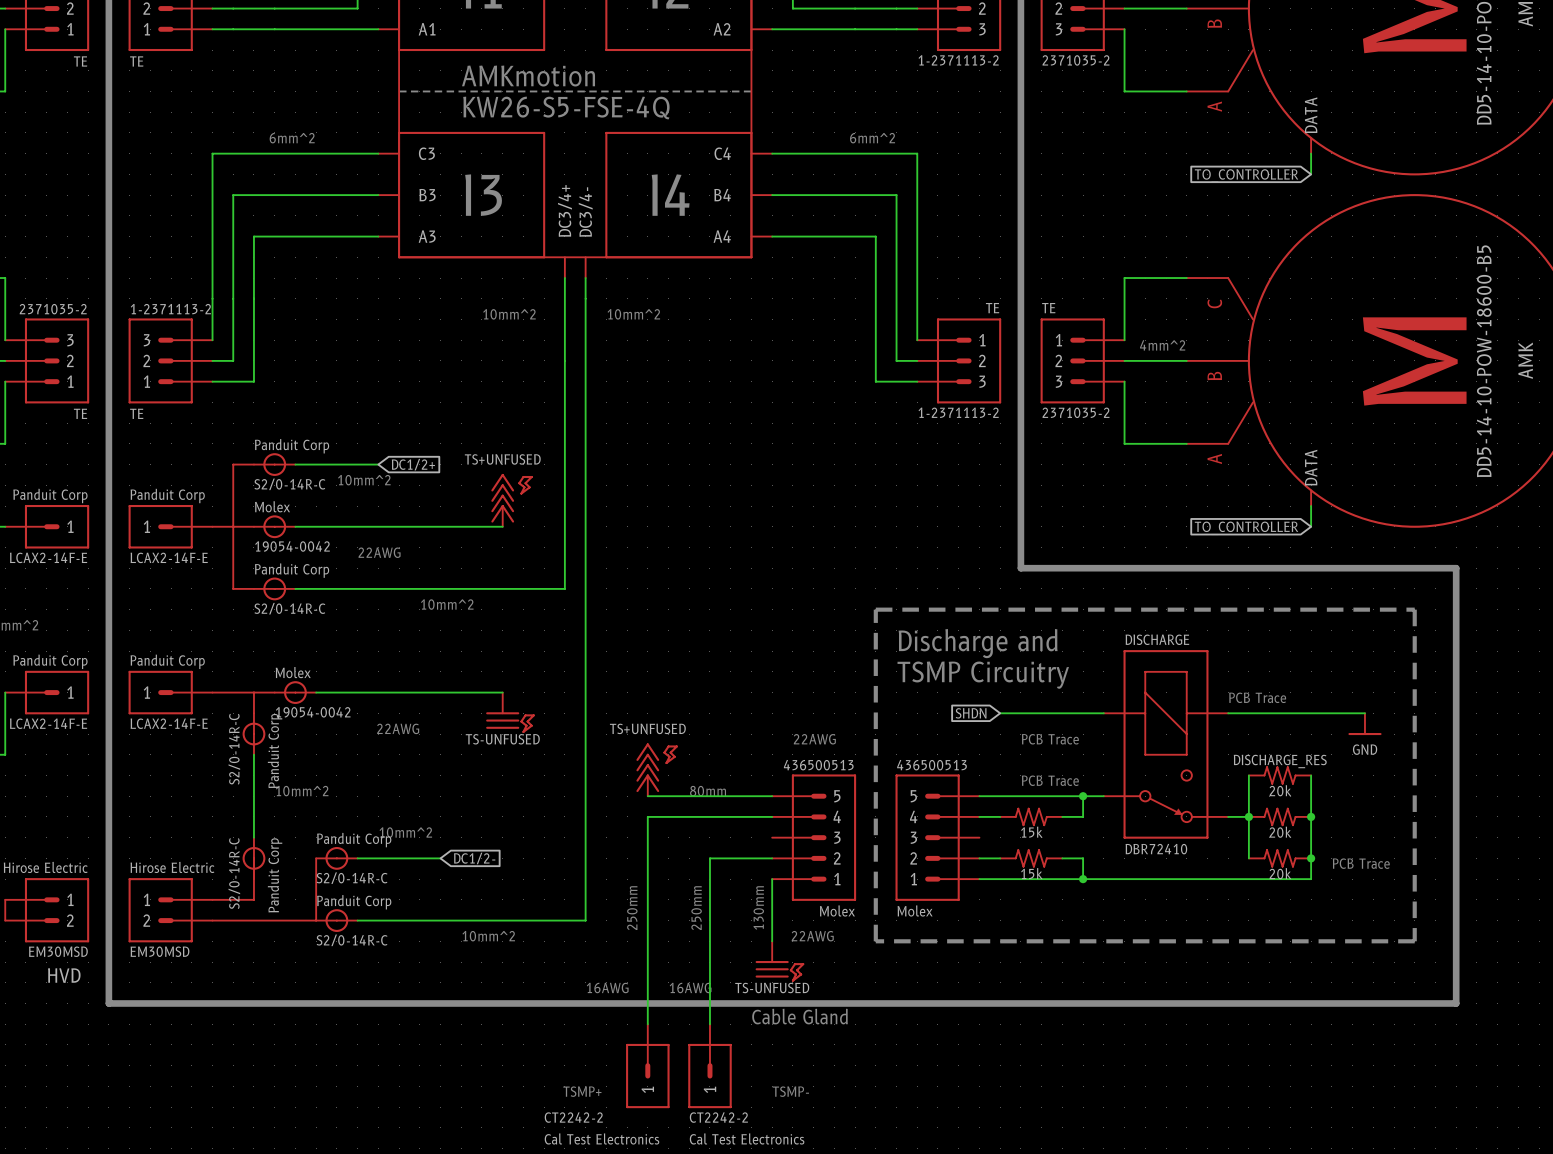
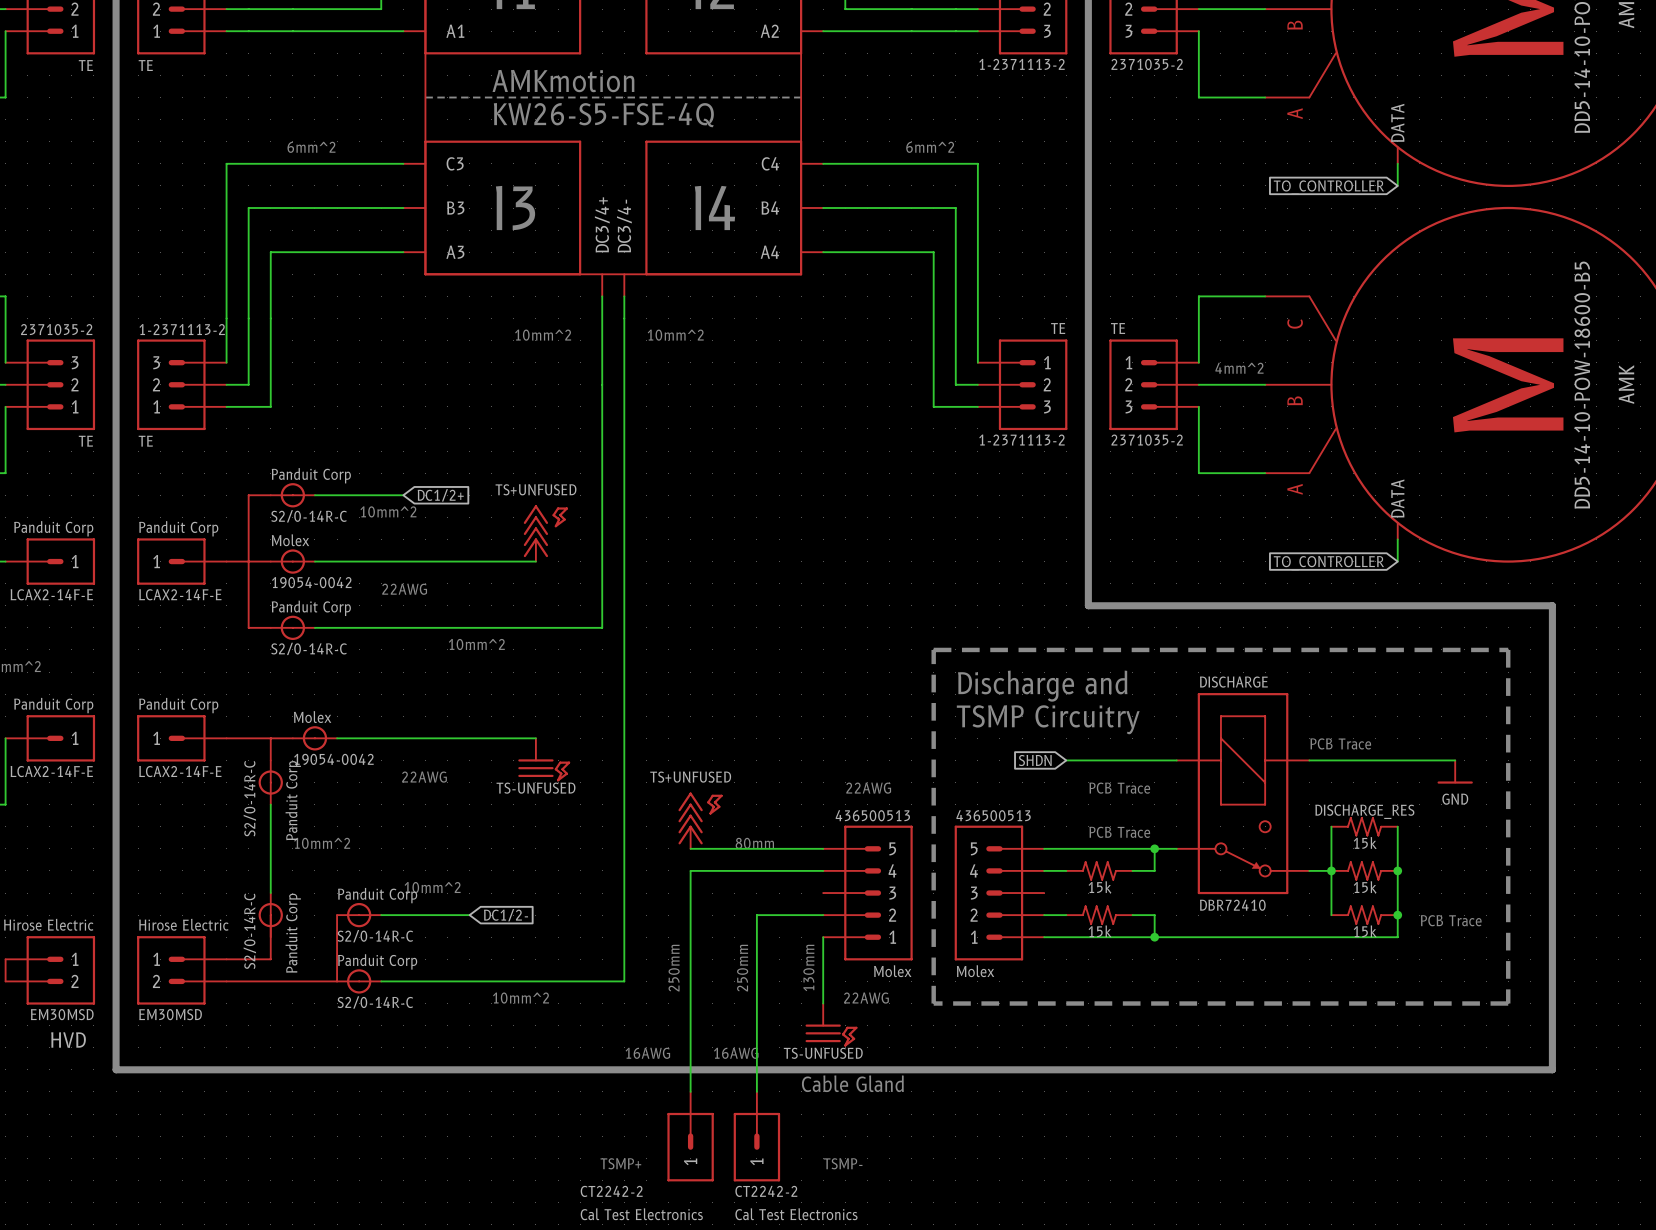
DISCHARGE_RES value: 20k (1280, 790) -> 15k (1365, 842)
part value: 20k (1280, 832) -> 15k (1365, 887)
part value: 20k (1280, 873) -> 15k (1365, 931)

